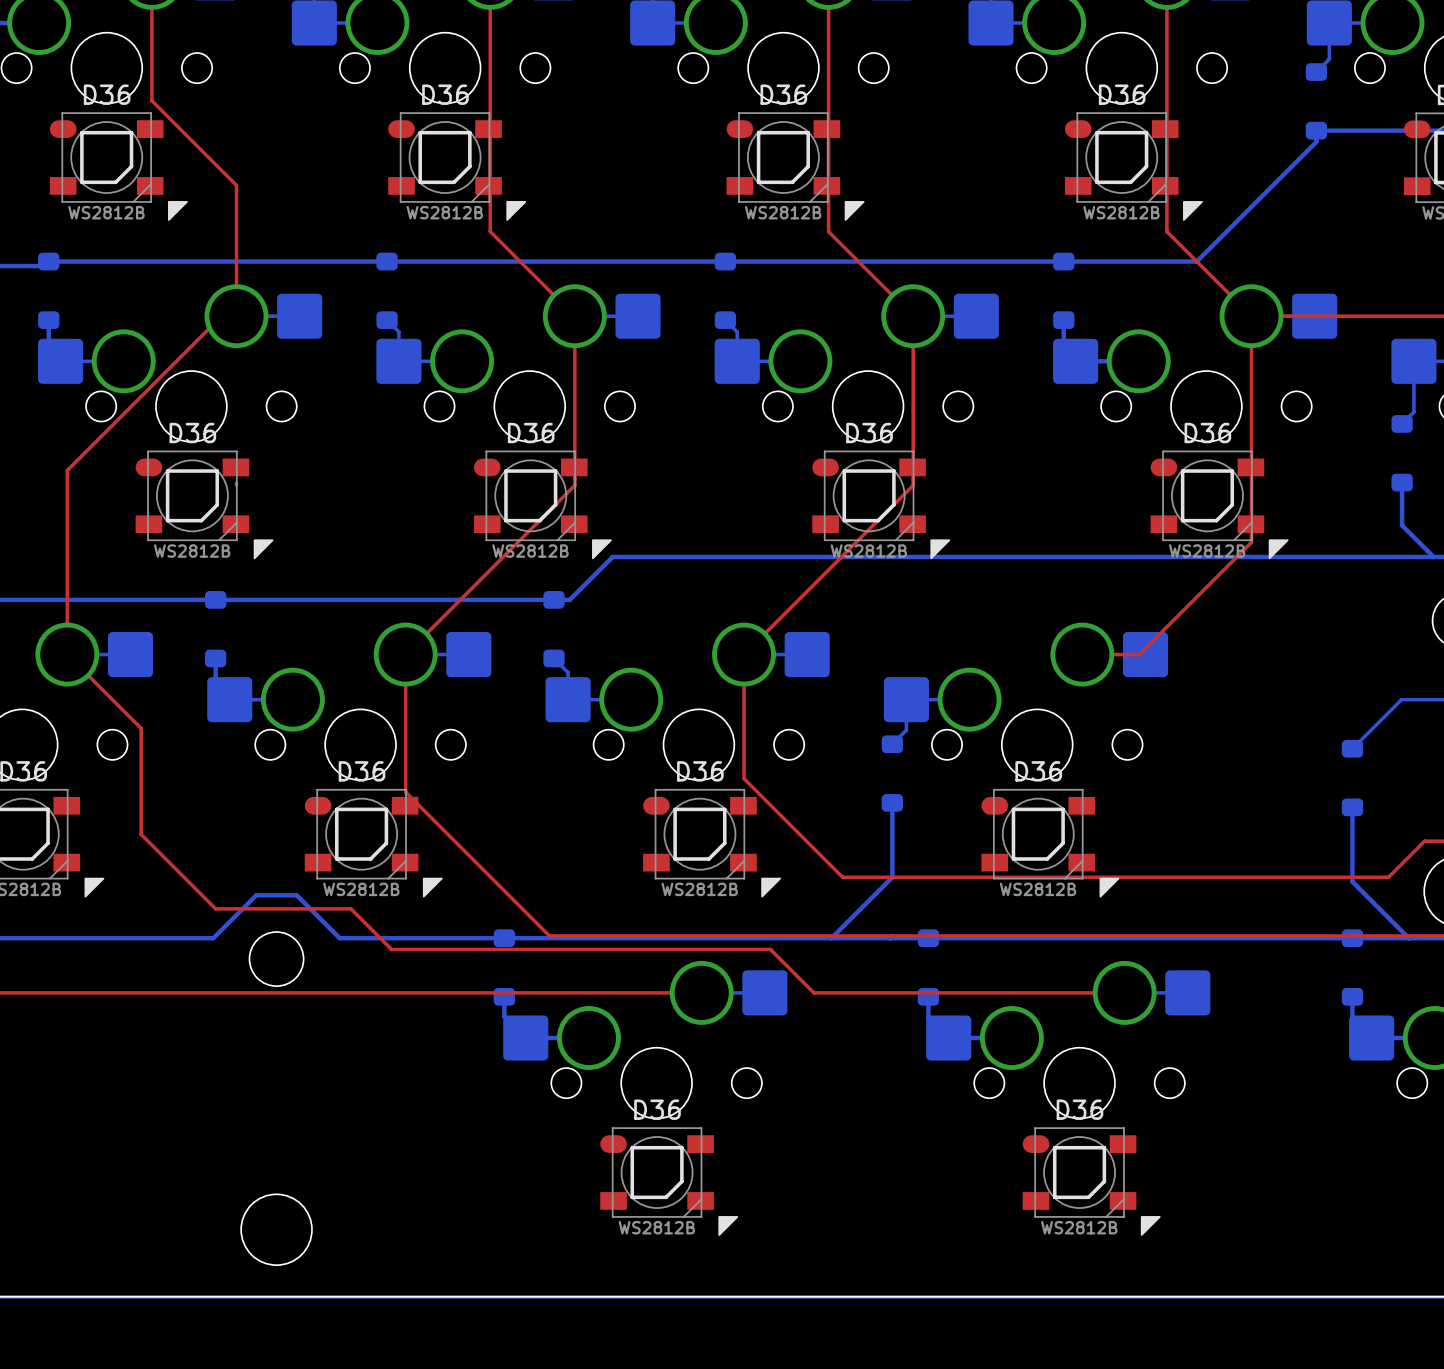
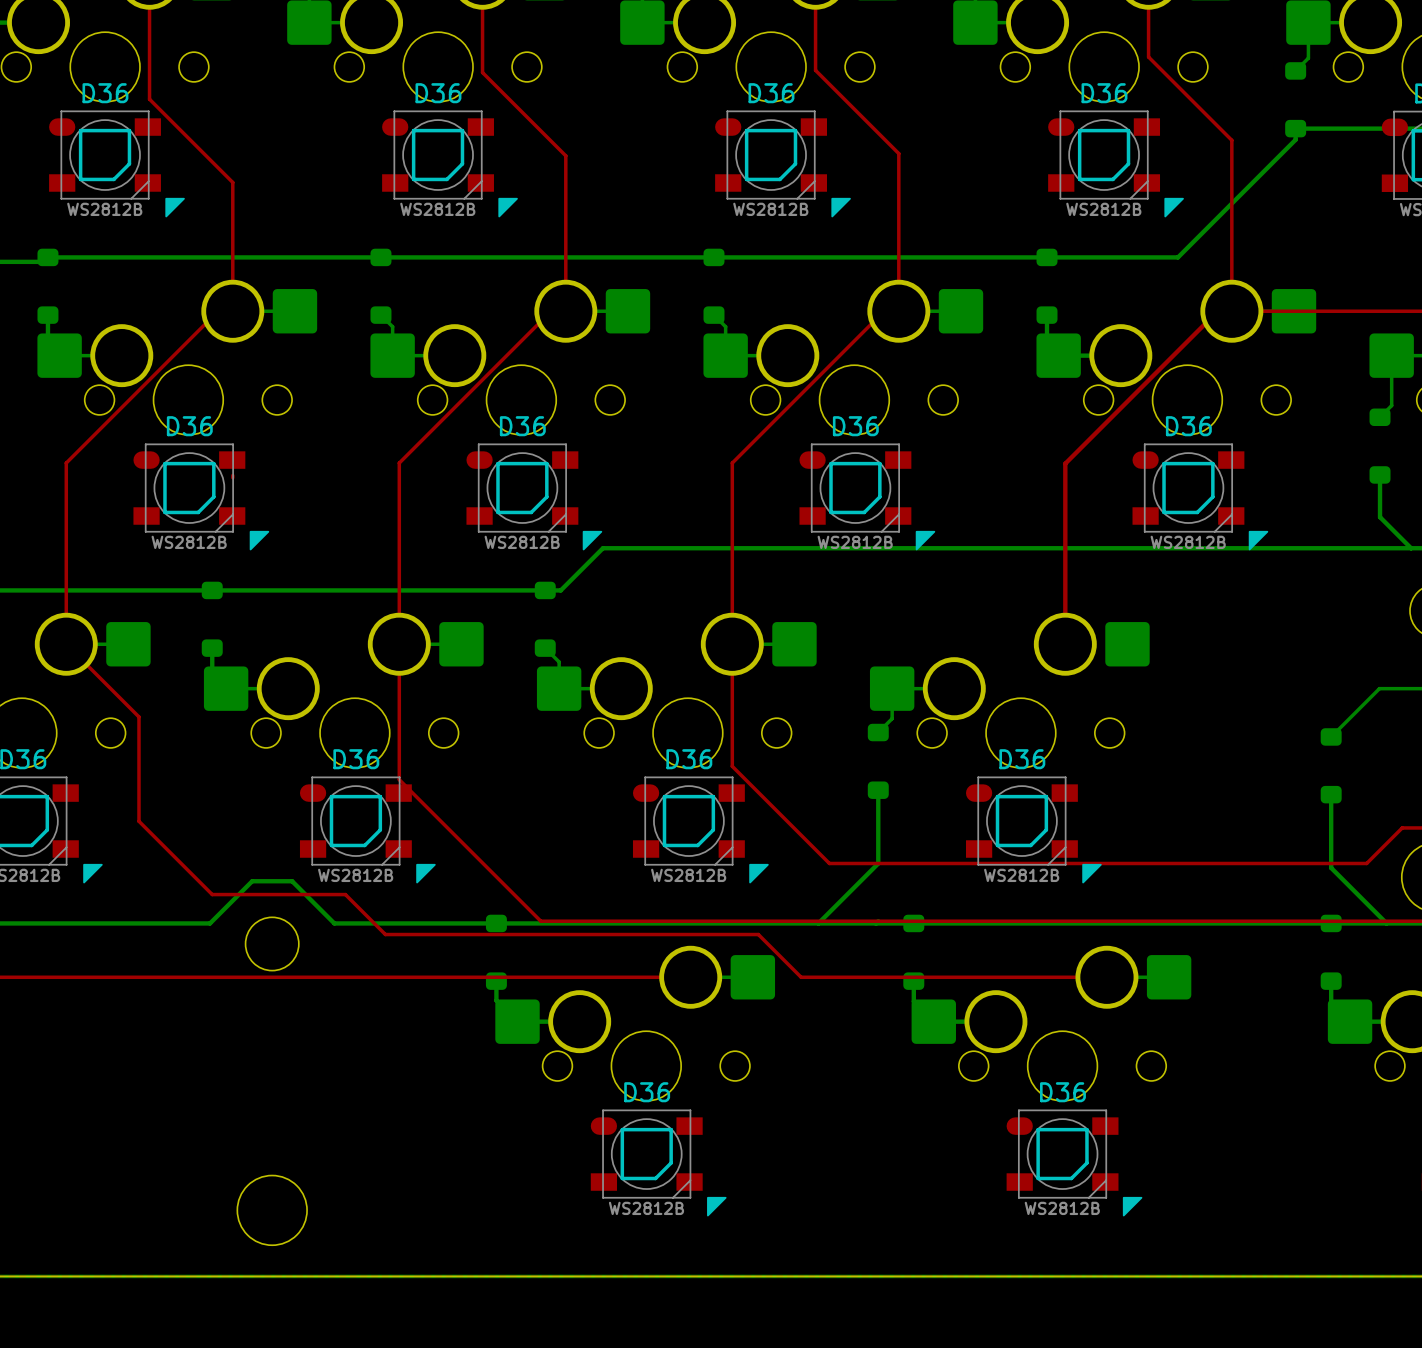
top track: (1166, 57) (1166, 231) (1251, 316) (1251, 542) (1139, 654) (1082, 654) -> (1148, 57) (1231, 140) (1231, 311) (1217, 311) (1065, 463) (1065, 644)
top track: (828, 71) (828, 231) (913, 316) (913, 485) (744, 654) -> (815, 70) (898, 153) (898, 311) (884, 311) (732, 463) (732, 644)
top track: (490, 73) (490, 231) (574, 316) (574, 485) (405, 654) -> (482, 72) (565, 155) (565, 311) (551, 311) (399, 463) (399, 644)

